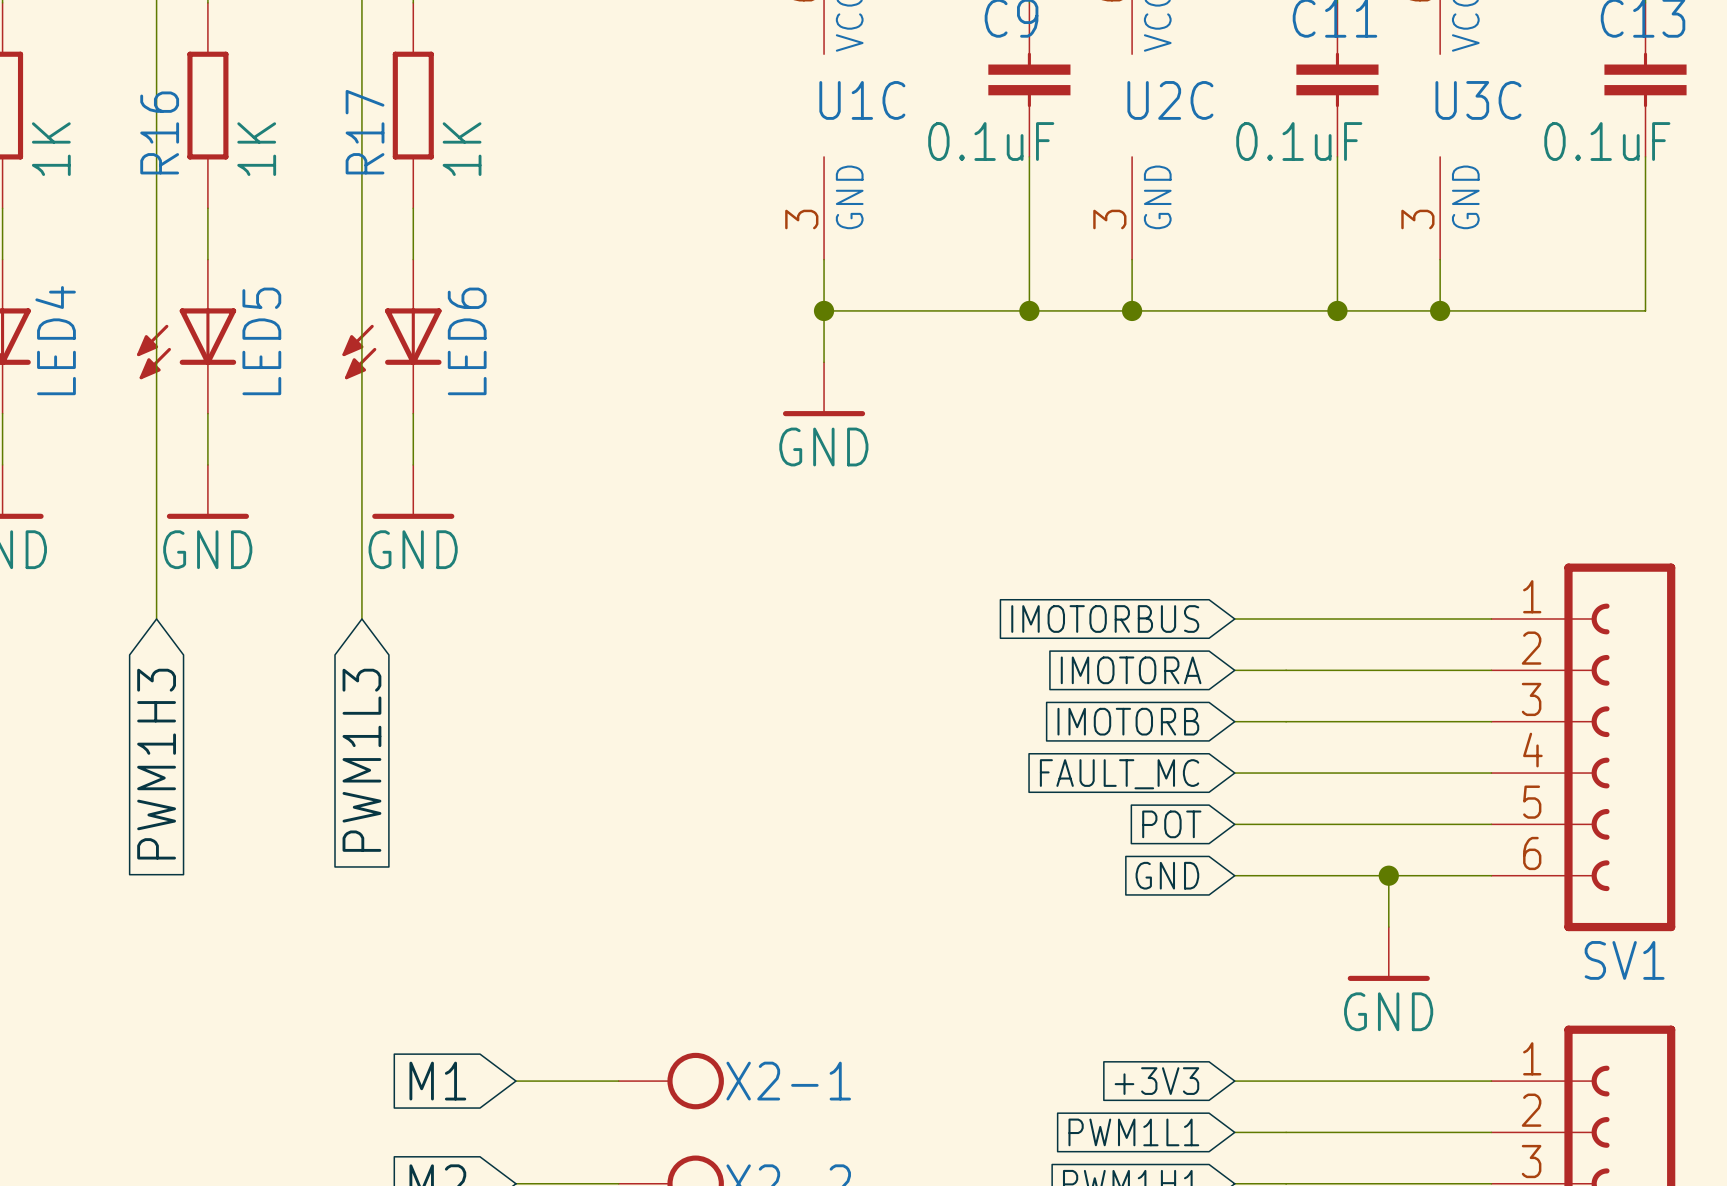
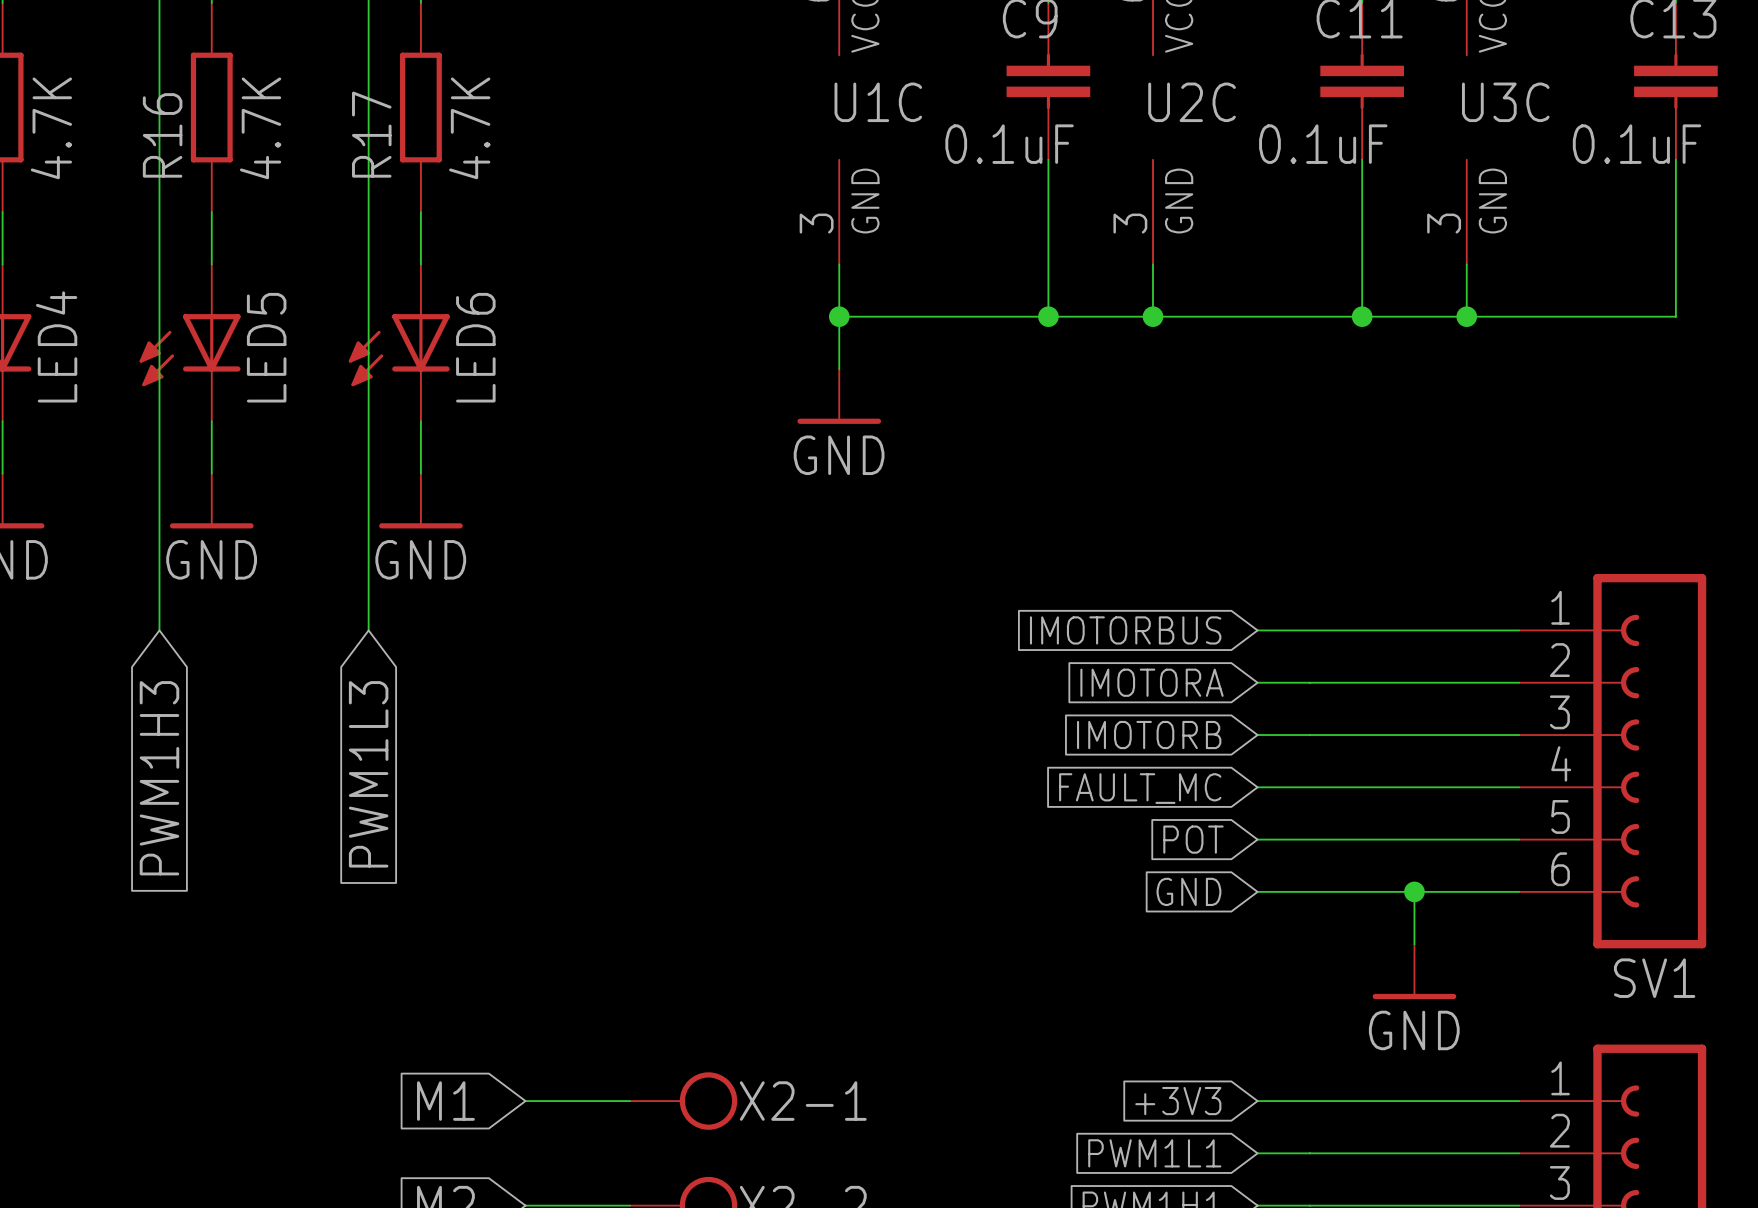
part value: 1K (51, 149) -> 4.7K (51, 128)
R16 value: 1K (256, 149) -> 4.7K (260, 128)
R17 value: 1K (462, 149) -> 4.7K (469, 128)

